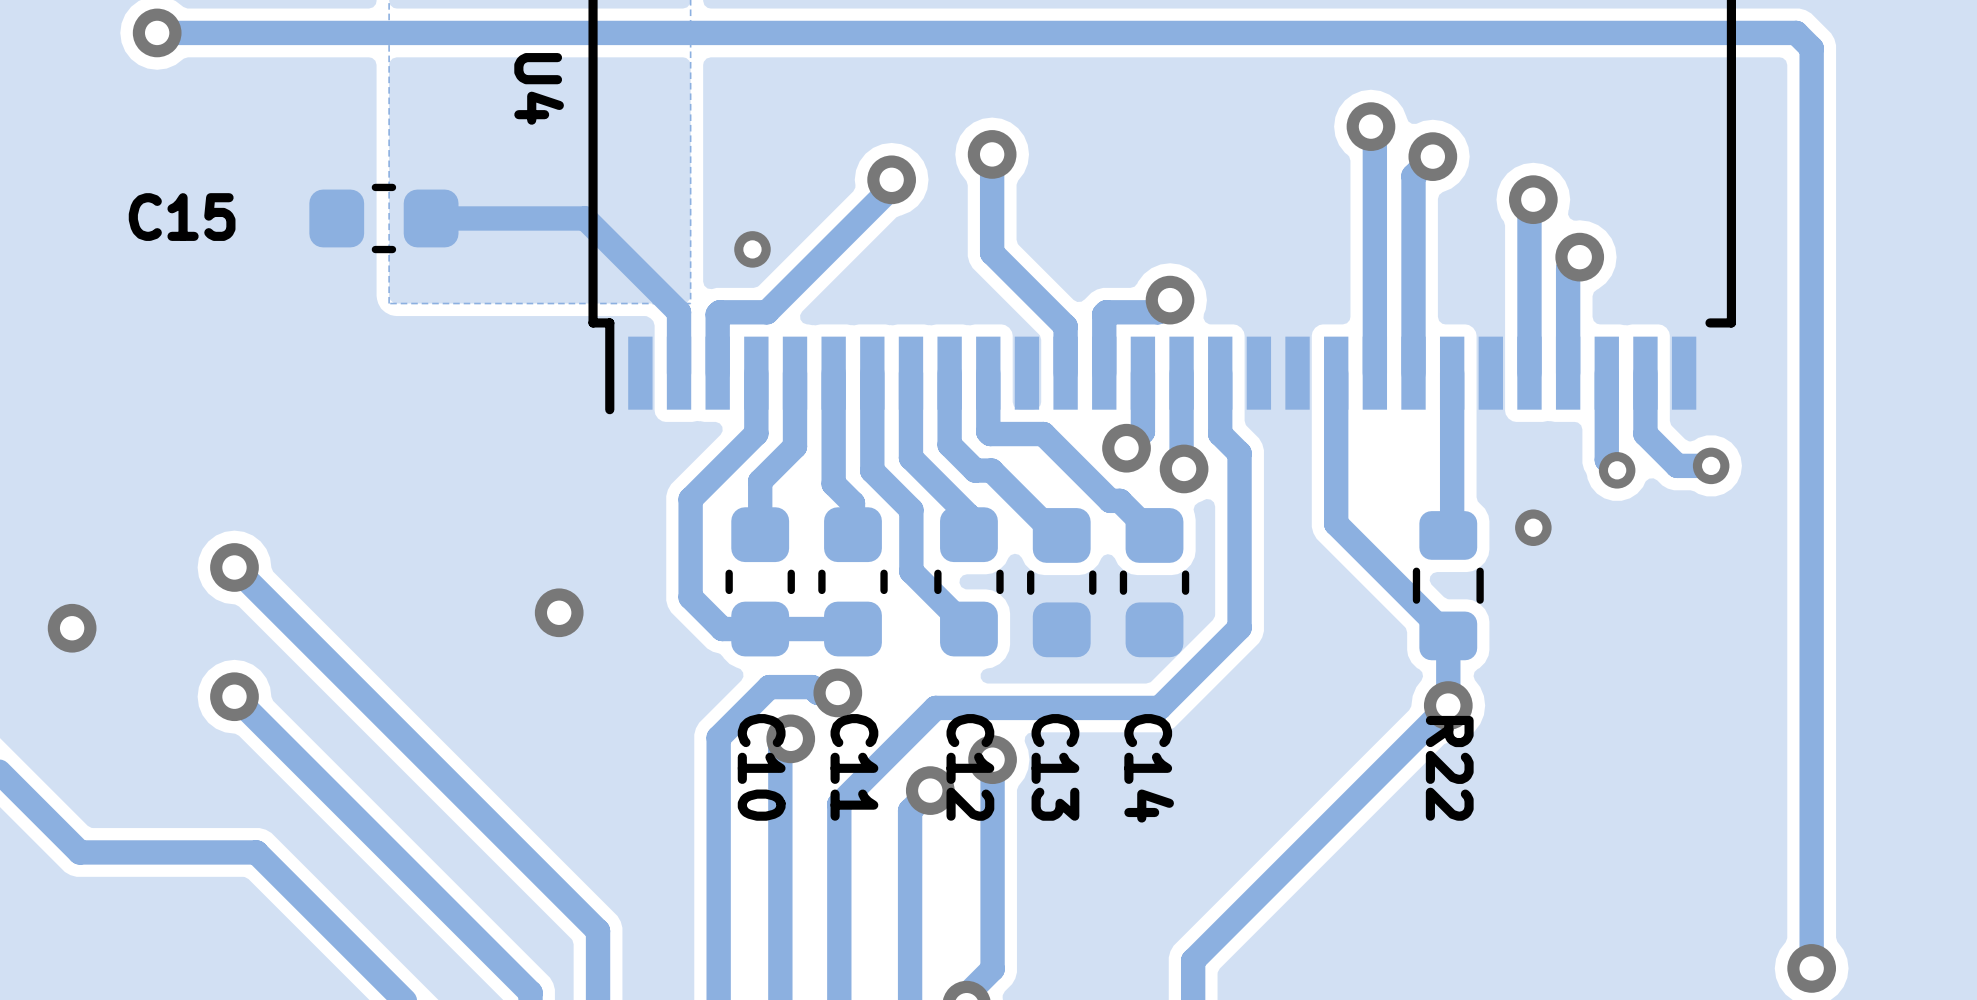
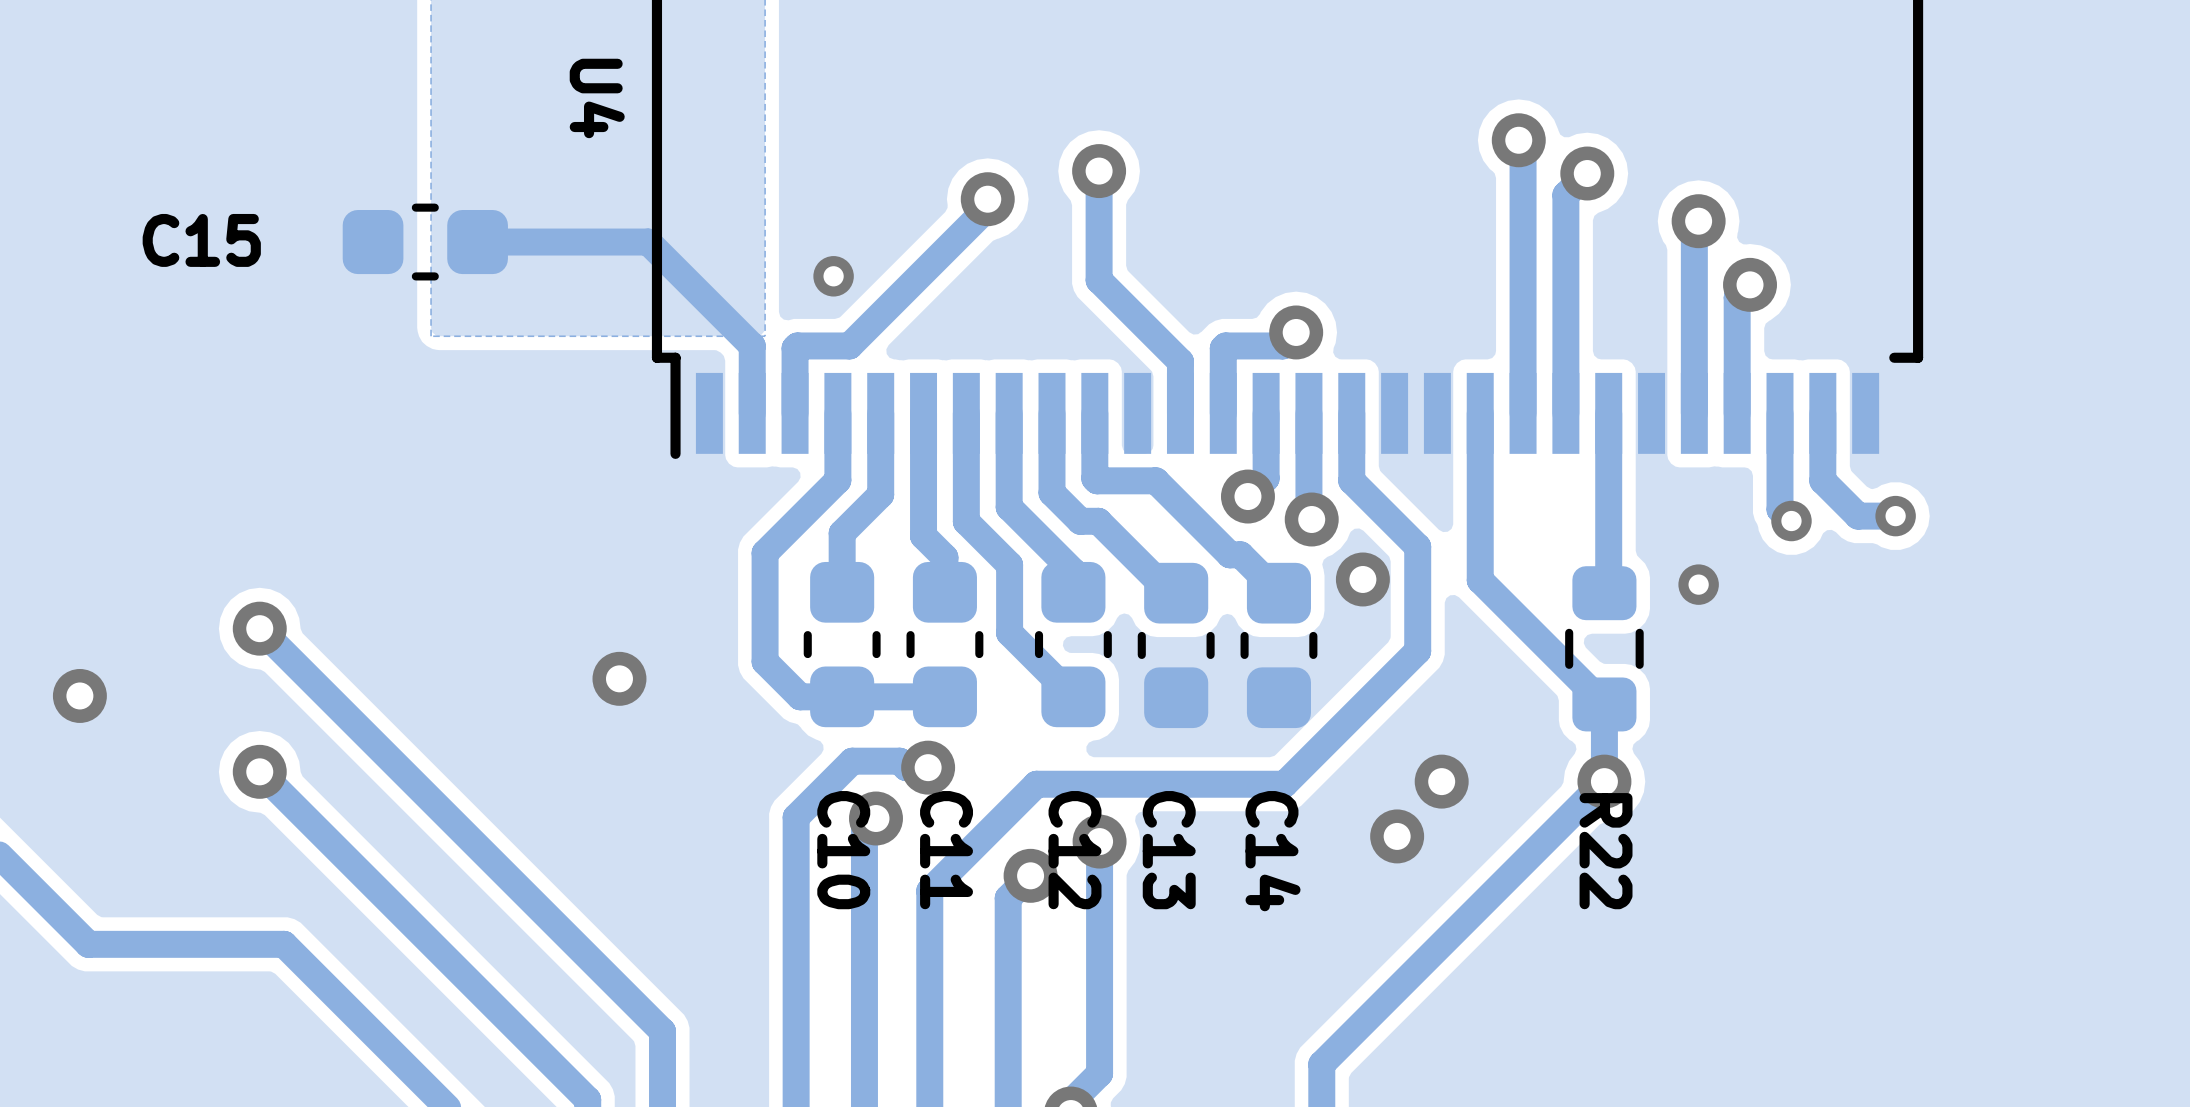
track: (157, 32) (1796, 32) (1811, 48) (1811, 968) -> none
via: (157, 32) -> none
track: (1239, 453) (1239, 627) -> (1373, 502) (1417, 546) (1417, 651) (1373, 695)
via: none -> (1362, 579)
via: none -> (1441, 781)
via: none -> (1397, 836)
via: (1811, 968) -> none

